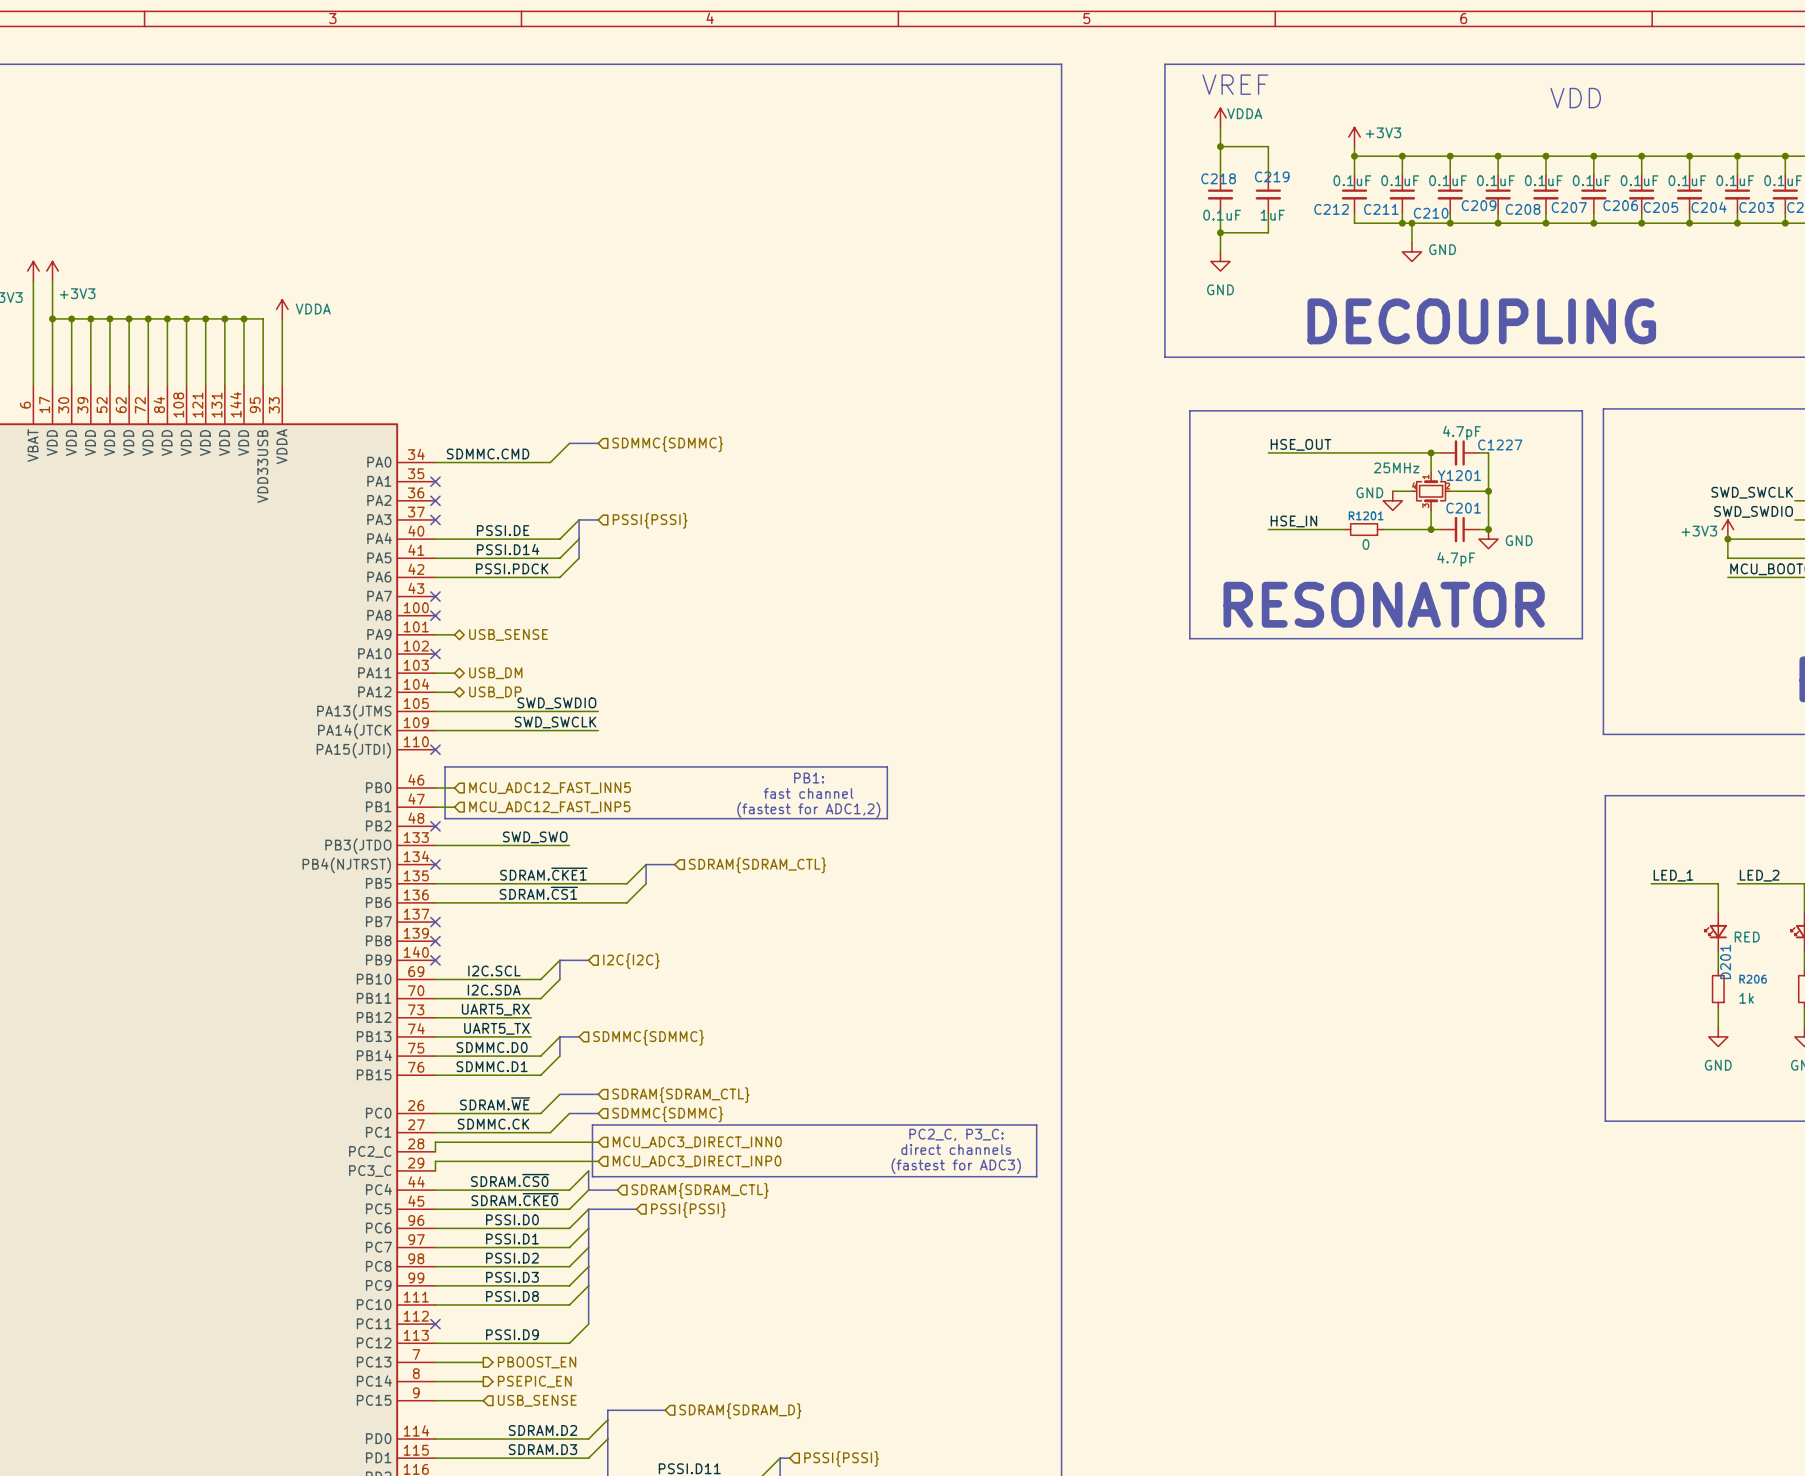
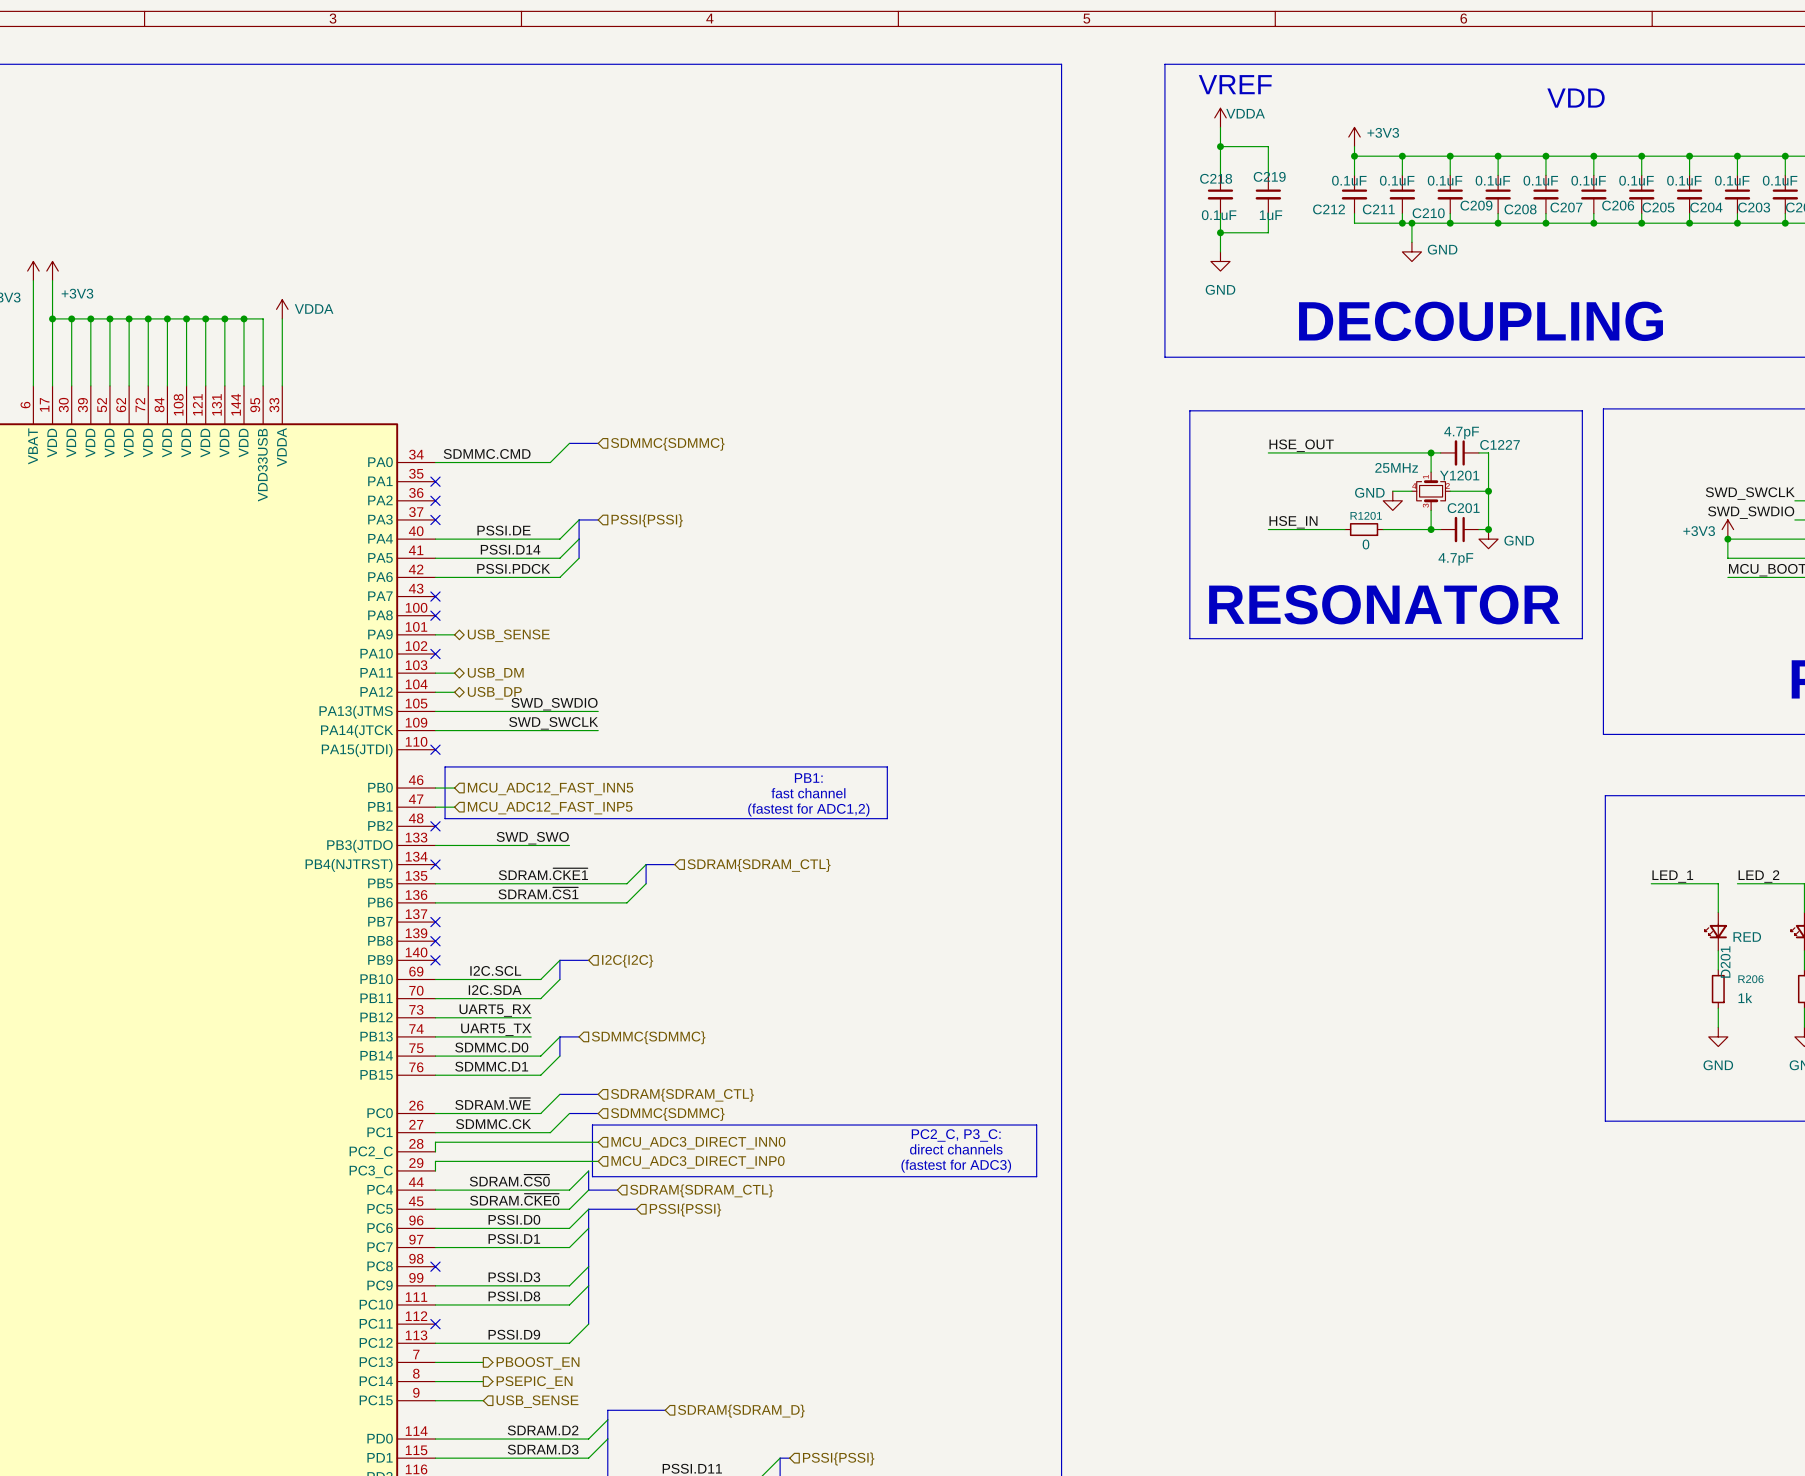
wire: (588, 1247) (569, 1266) (435, 1266) -> none
label: PSSI.D2 (512, 1258) -> none
no-connect mark: none -> (435, 1266)

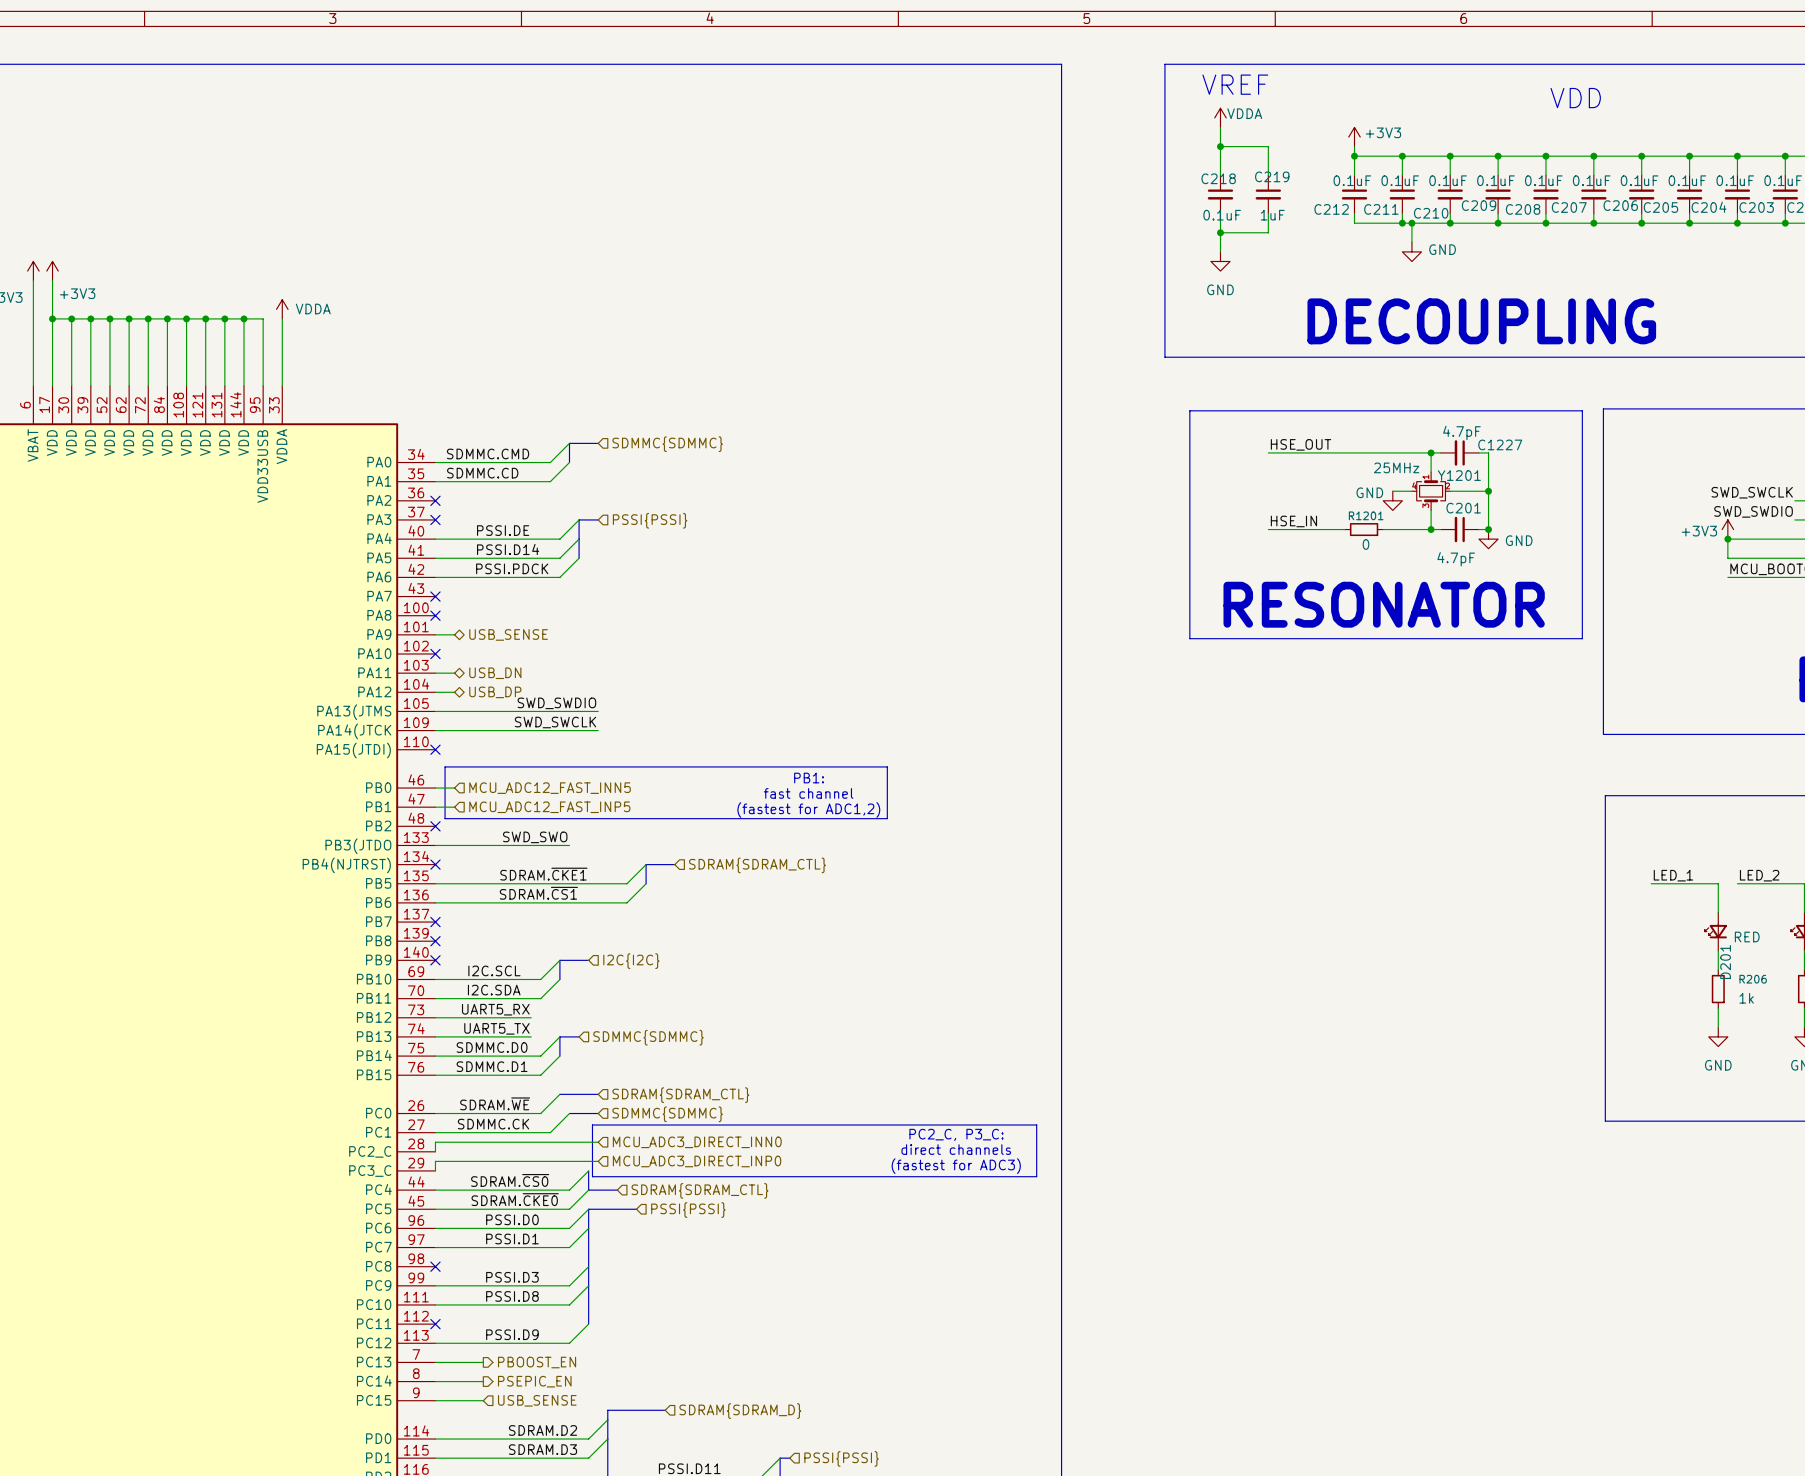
bus: none -> (569, 443) (569, 462)
wire: none -> (569, 462) (550, 481) (435, 481)
label: none -> SDMMC.CD (482, 473)
no-connect mark: (435, 481) -> none
hierarchical label: USB_DM (495, 674) -> USB_DN (495, 673)

